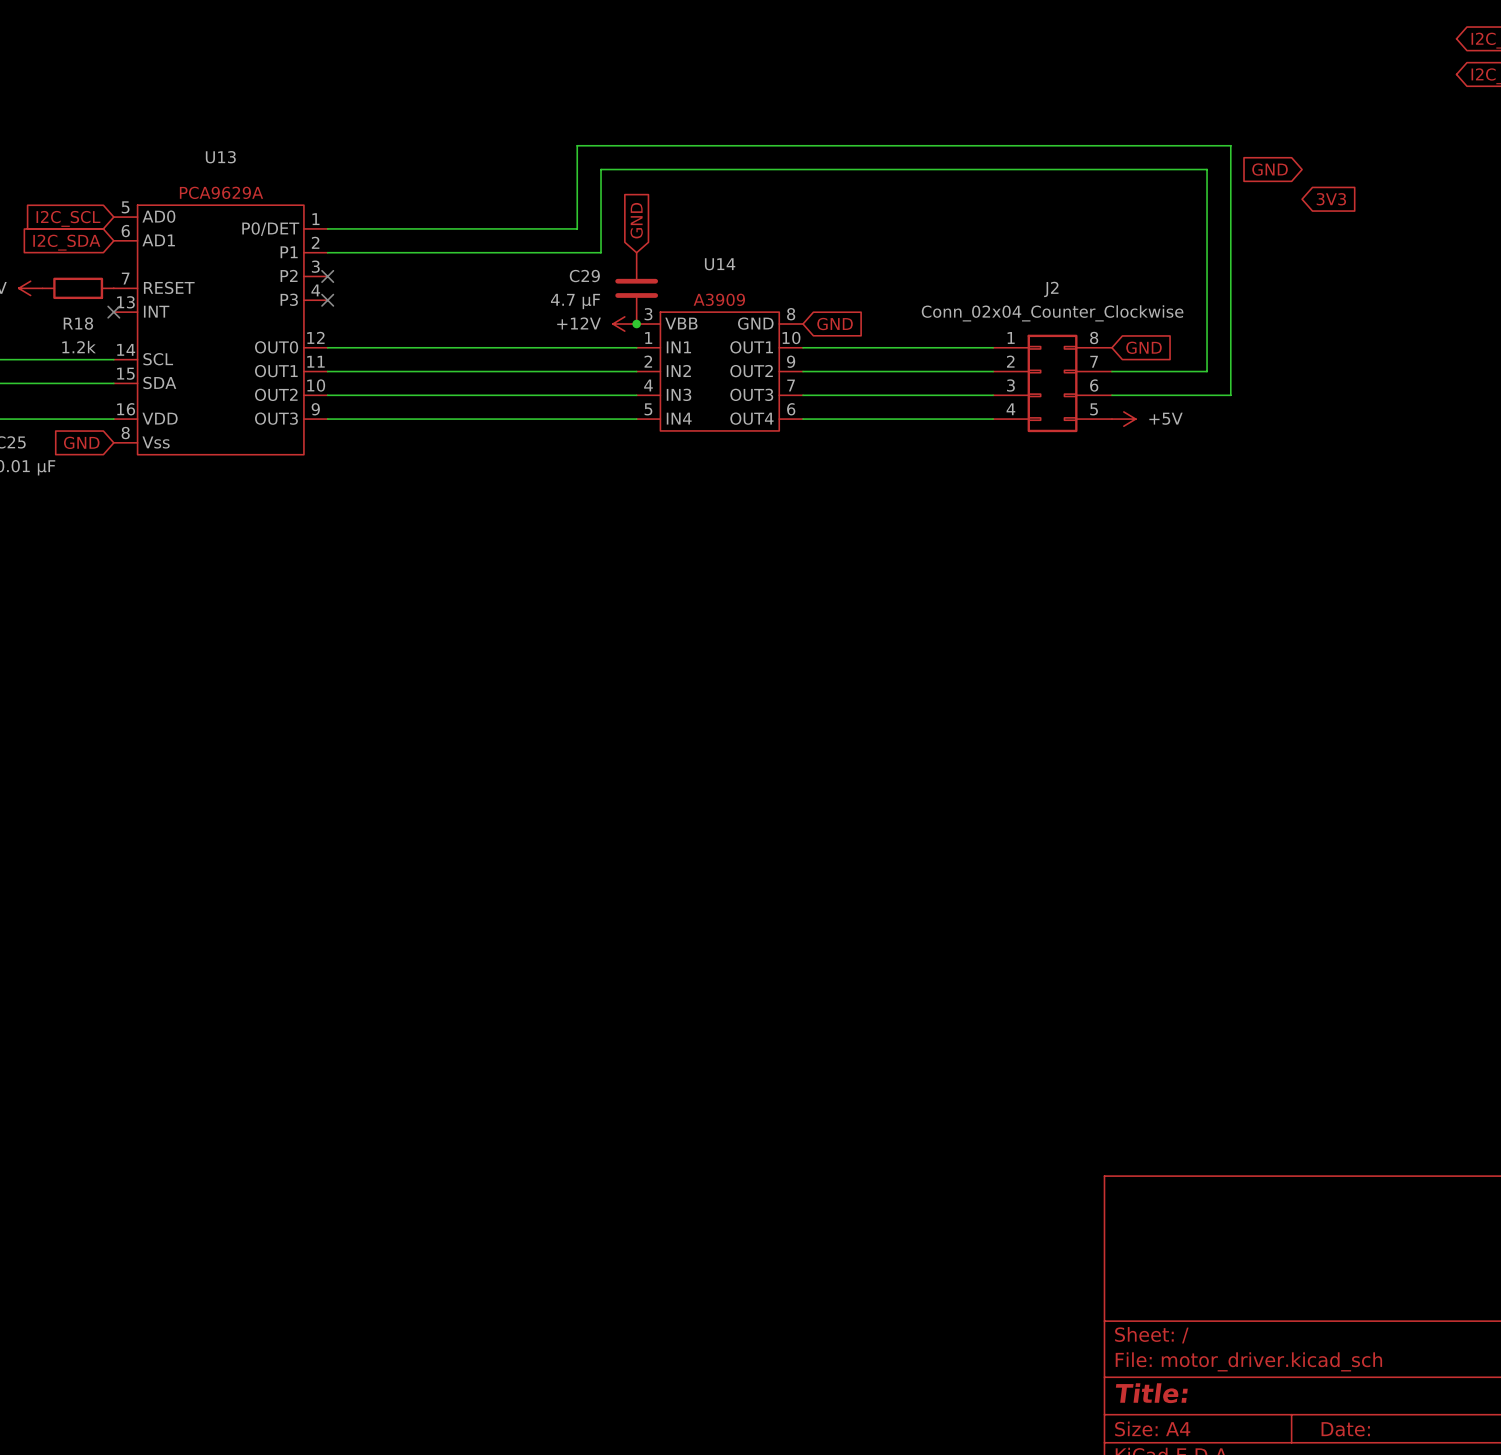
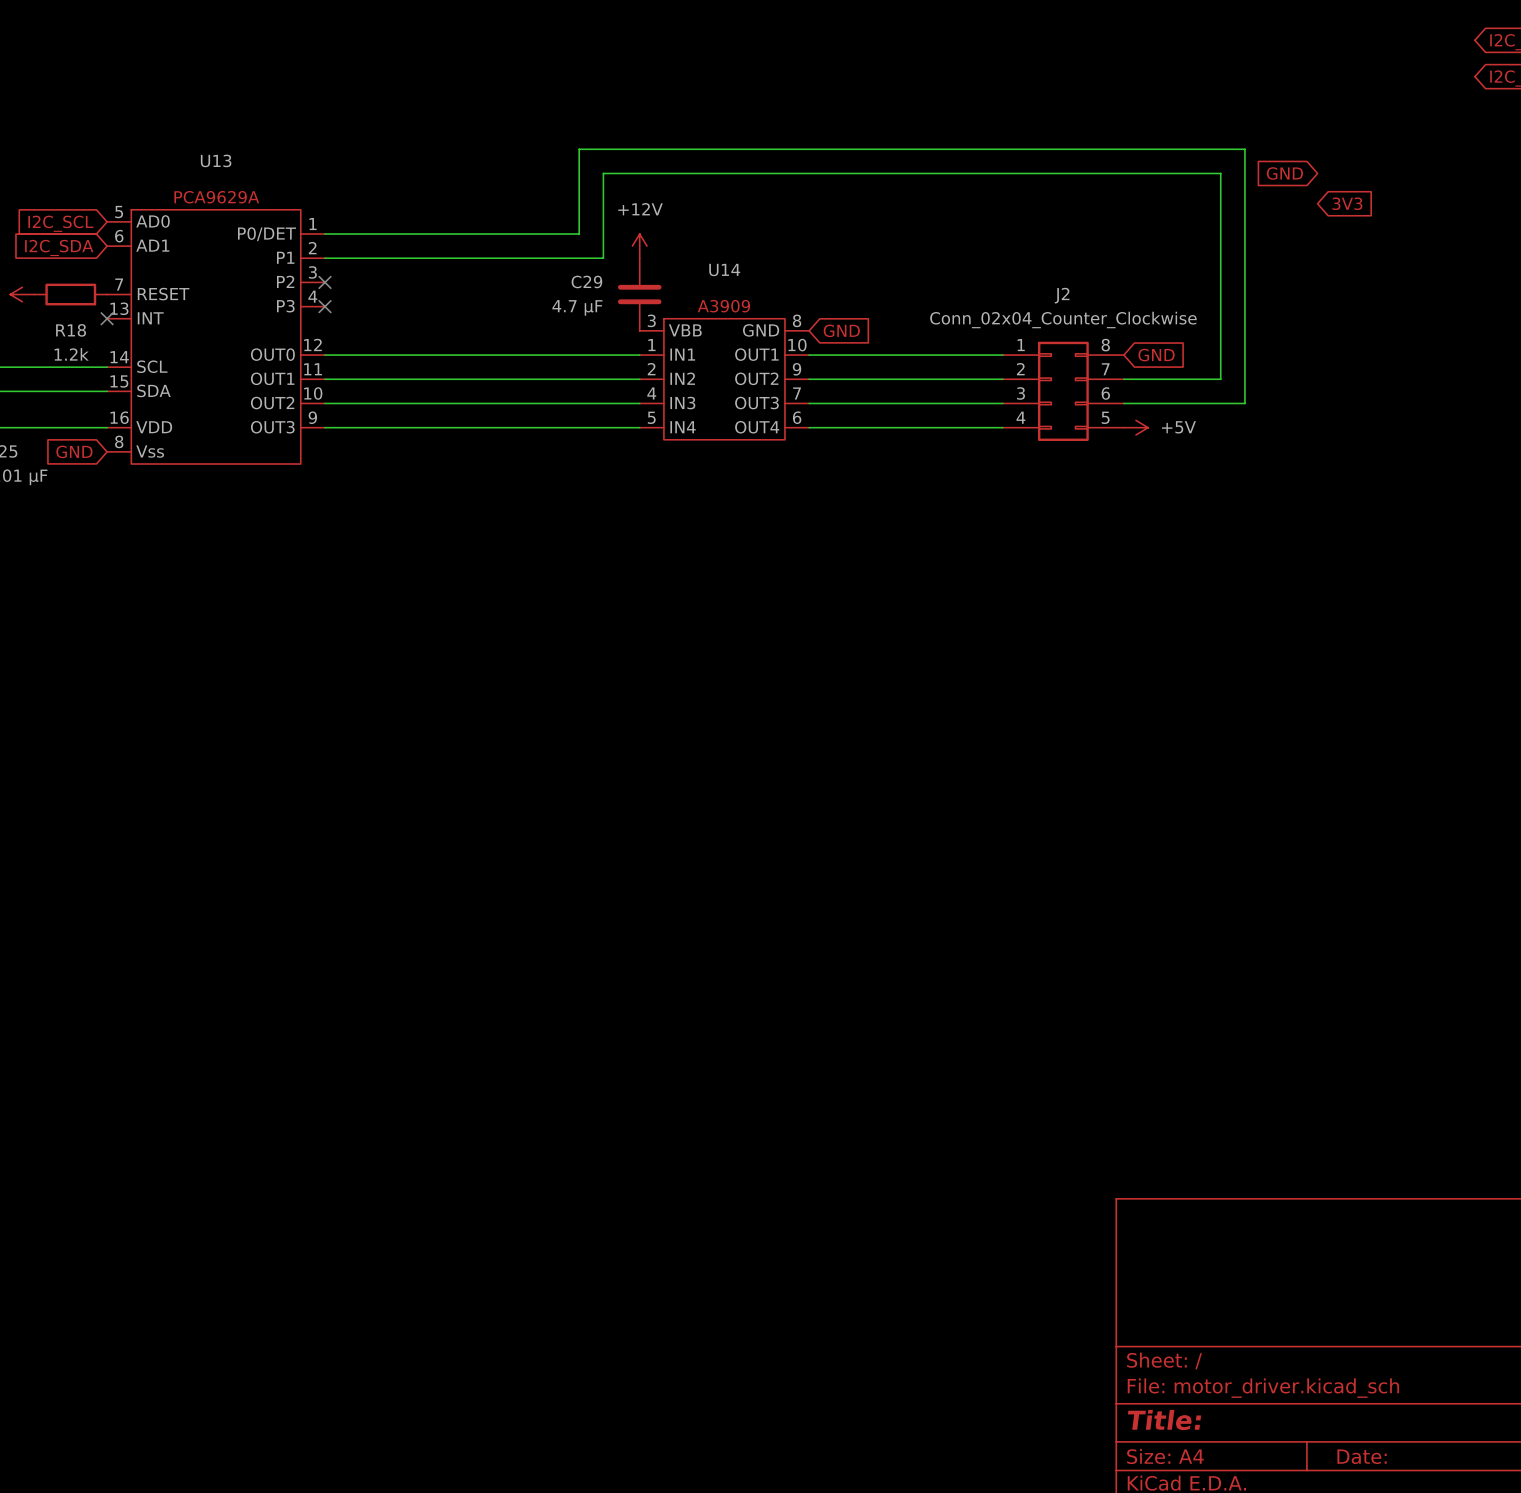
global label: GND (636, 220) -> none
power symbol rotation: 0° (624, 324) -> 90° clockwise (639, 246)
power symbol position: +12V (624, 324) -> +12V (639, 246)
junction: (636, 324) -> none

